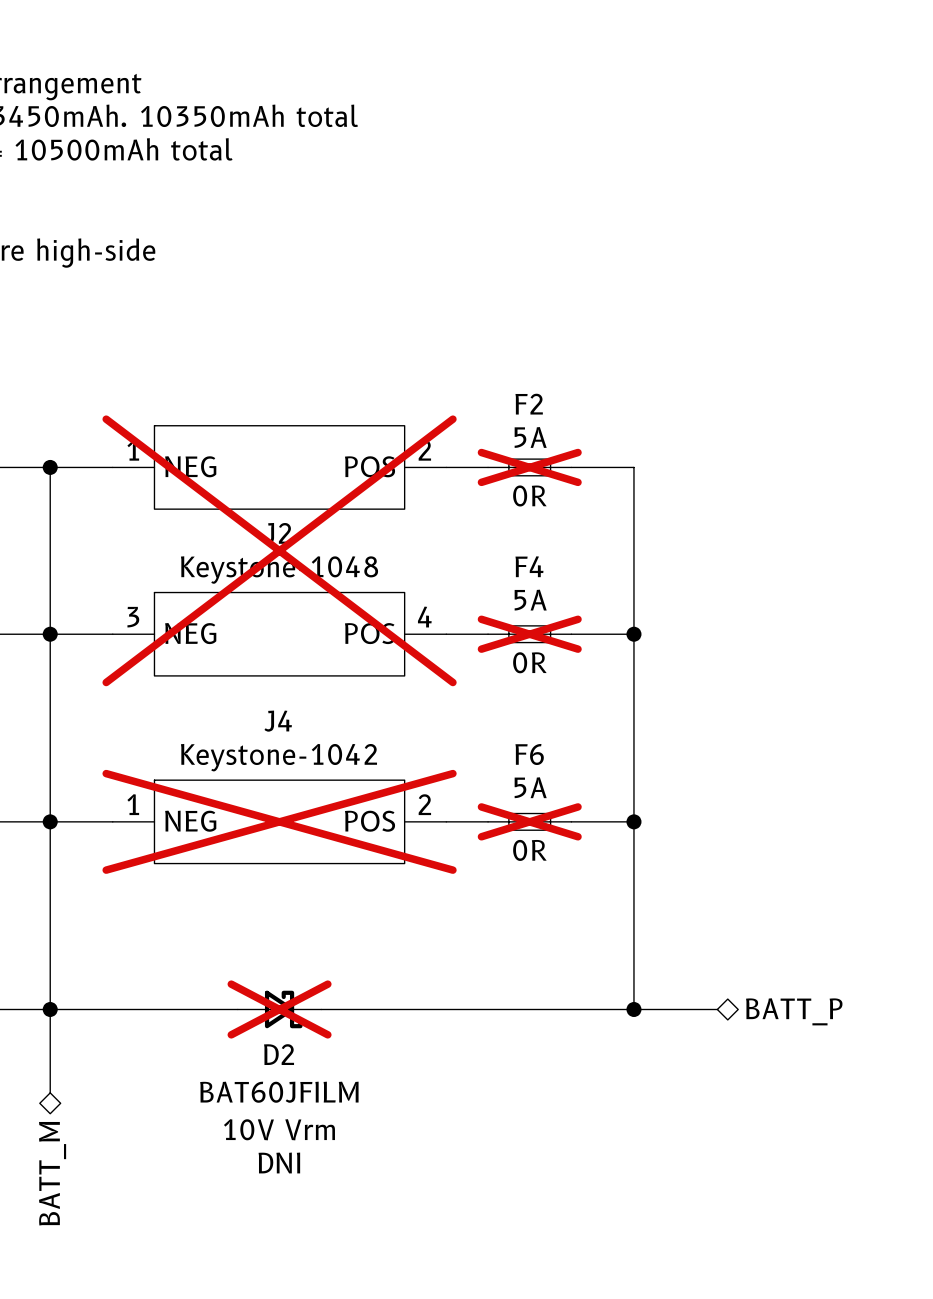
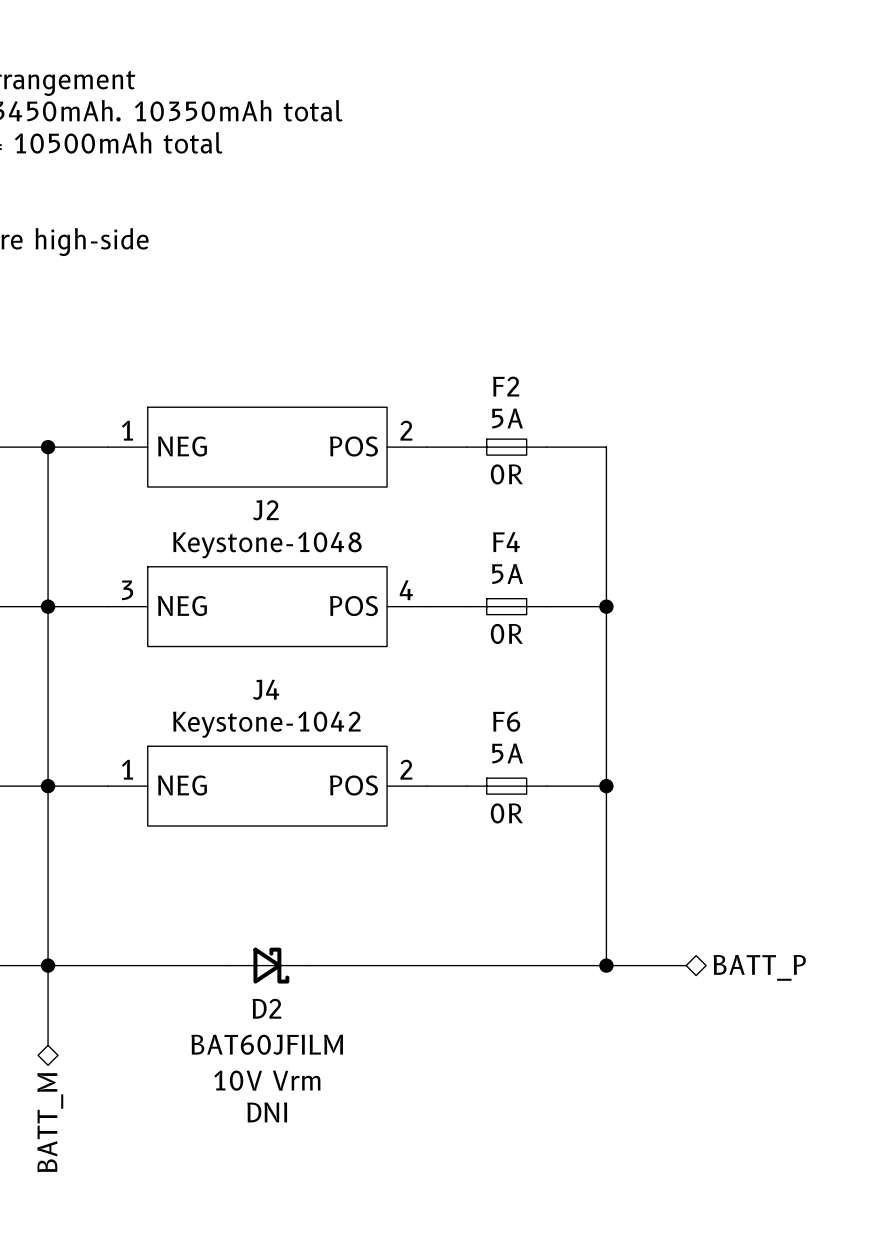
F2 do-not-place cross: (529, 467) -> none
J2 do-not-place cross: (279, 550) -> none
F4 do-not-place cross: (529, 634) -> none
J4 do-not-place cross: (279, 821) -> none
F6 do-not-place cross: (529, 821) -> none
D2 do-not-place cross: (279, 1009) -> none

